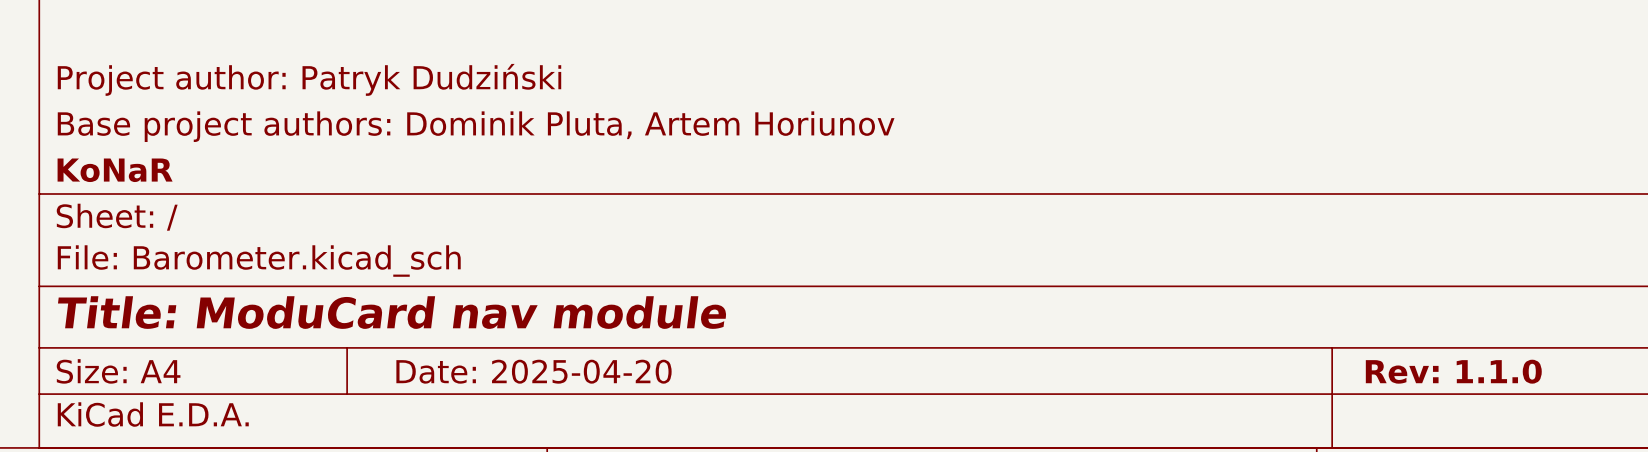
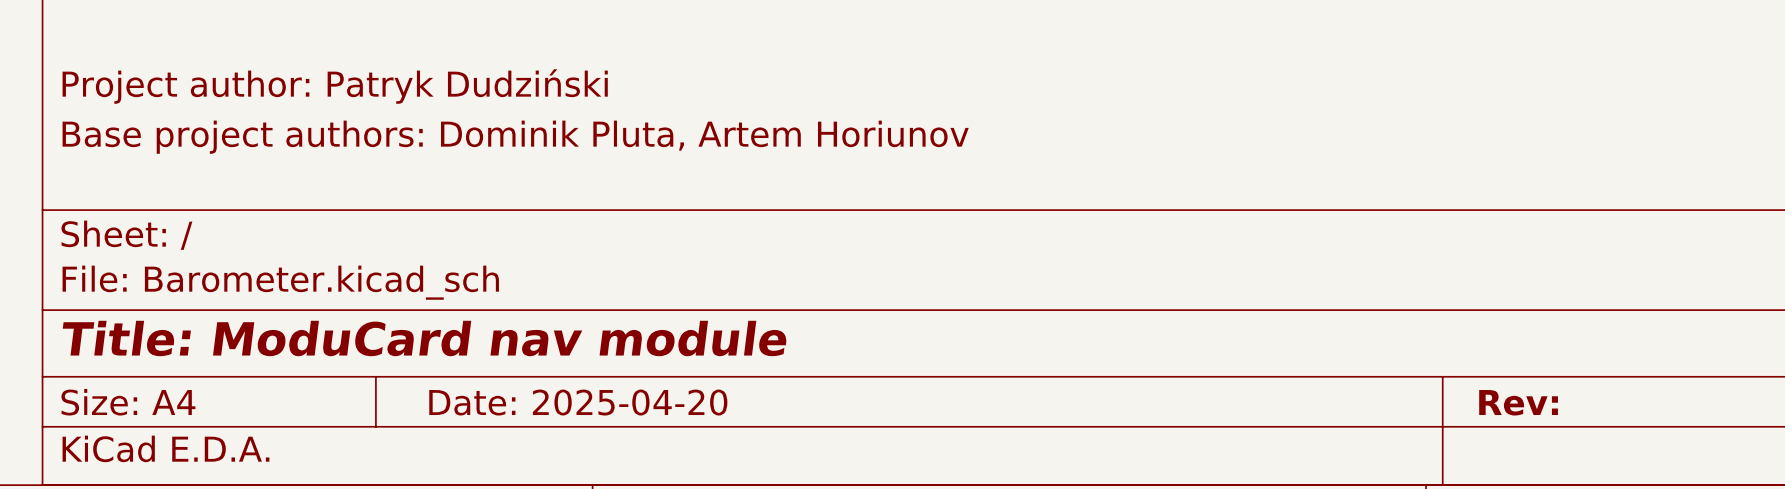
title block: KoNaR (115, 170) -> none
title block: Rev: 1.1.0 (1453, 371) -> Rev: (1518, 402)

